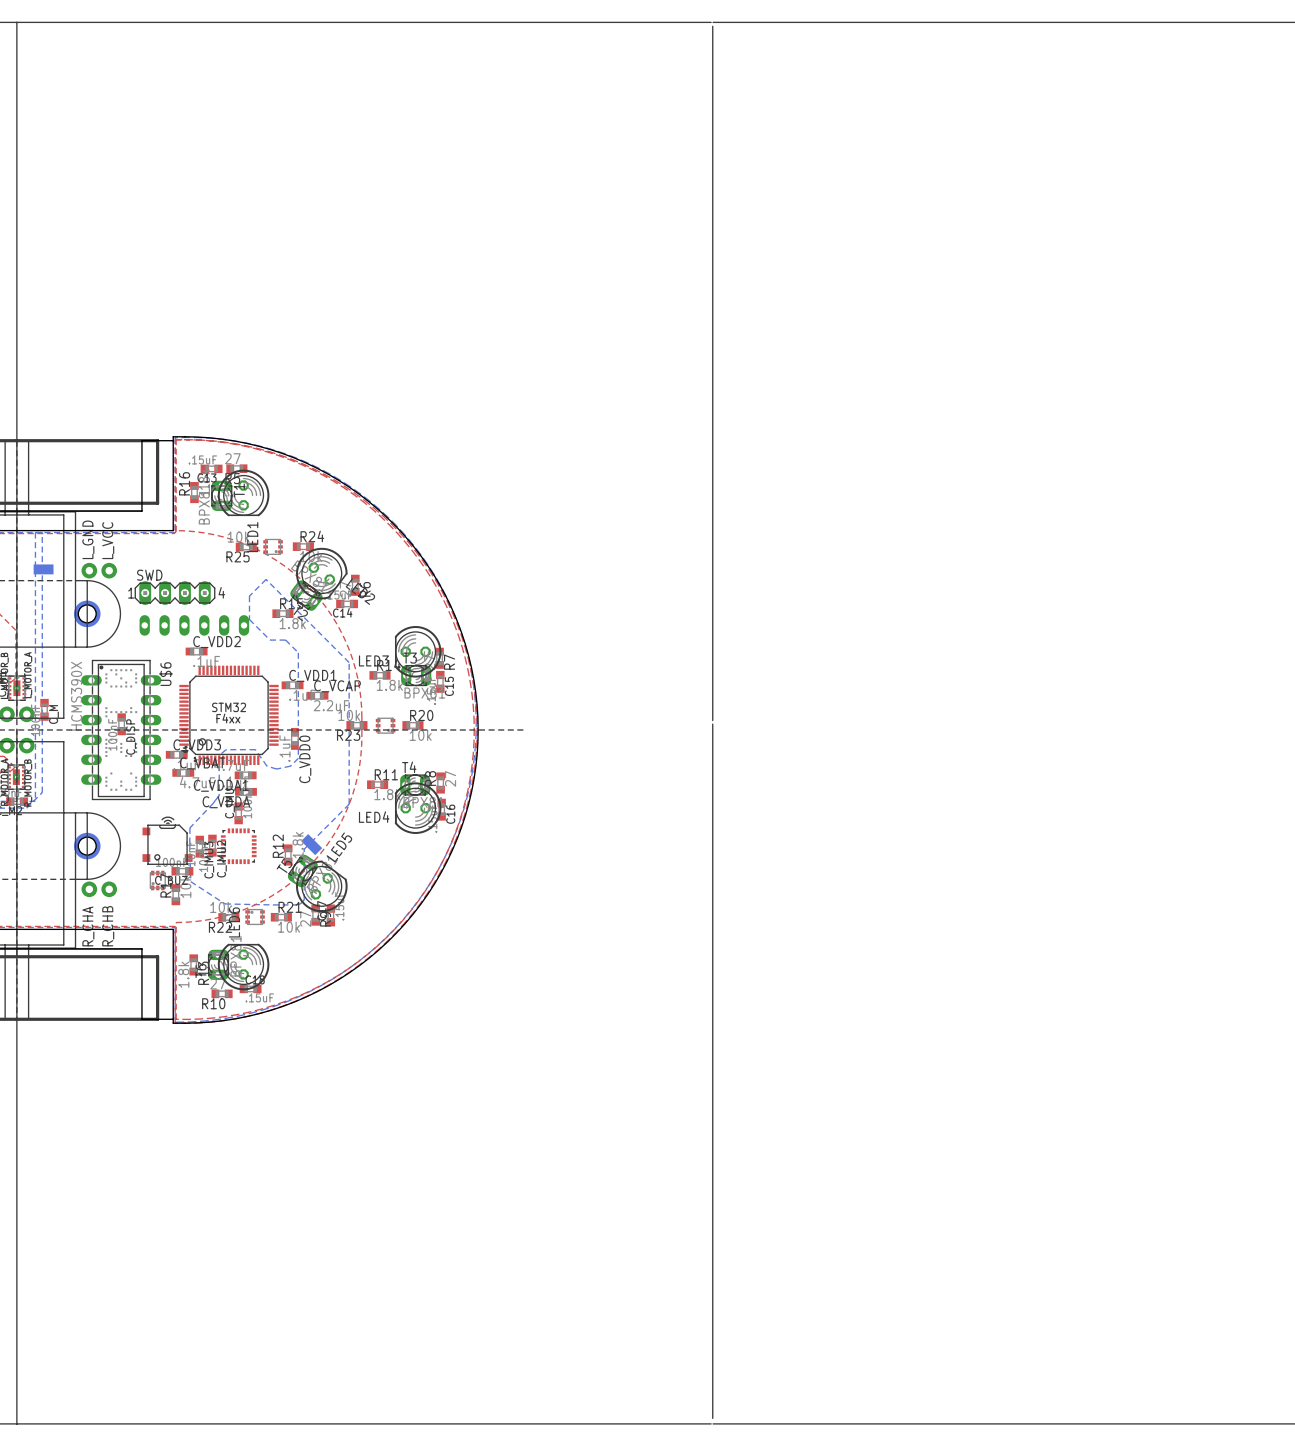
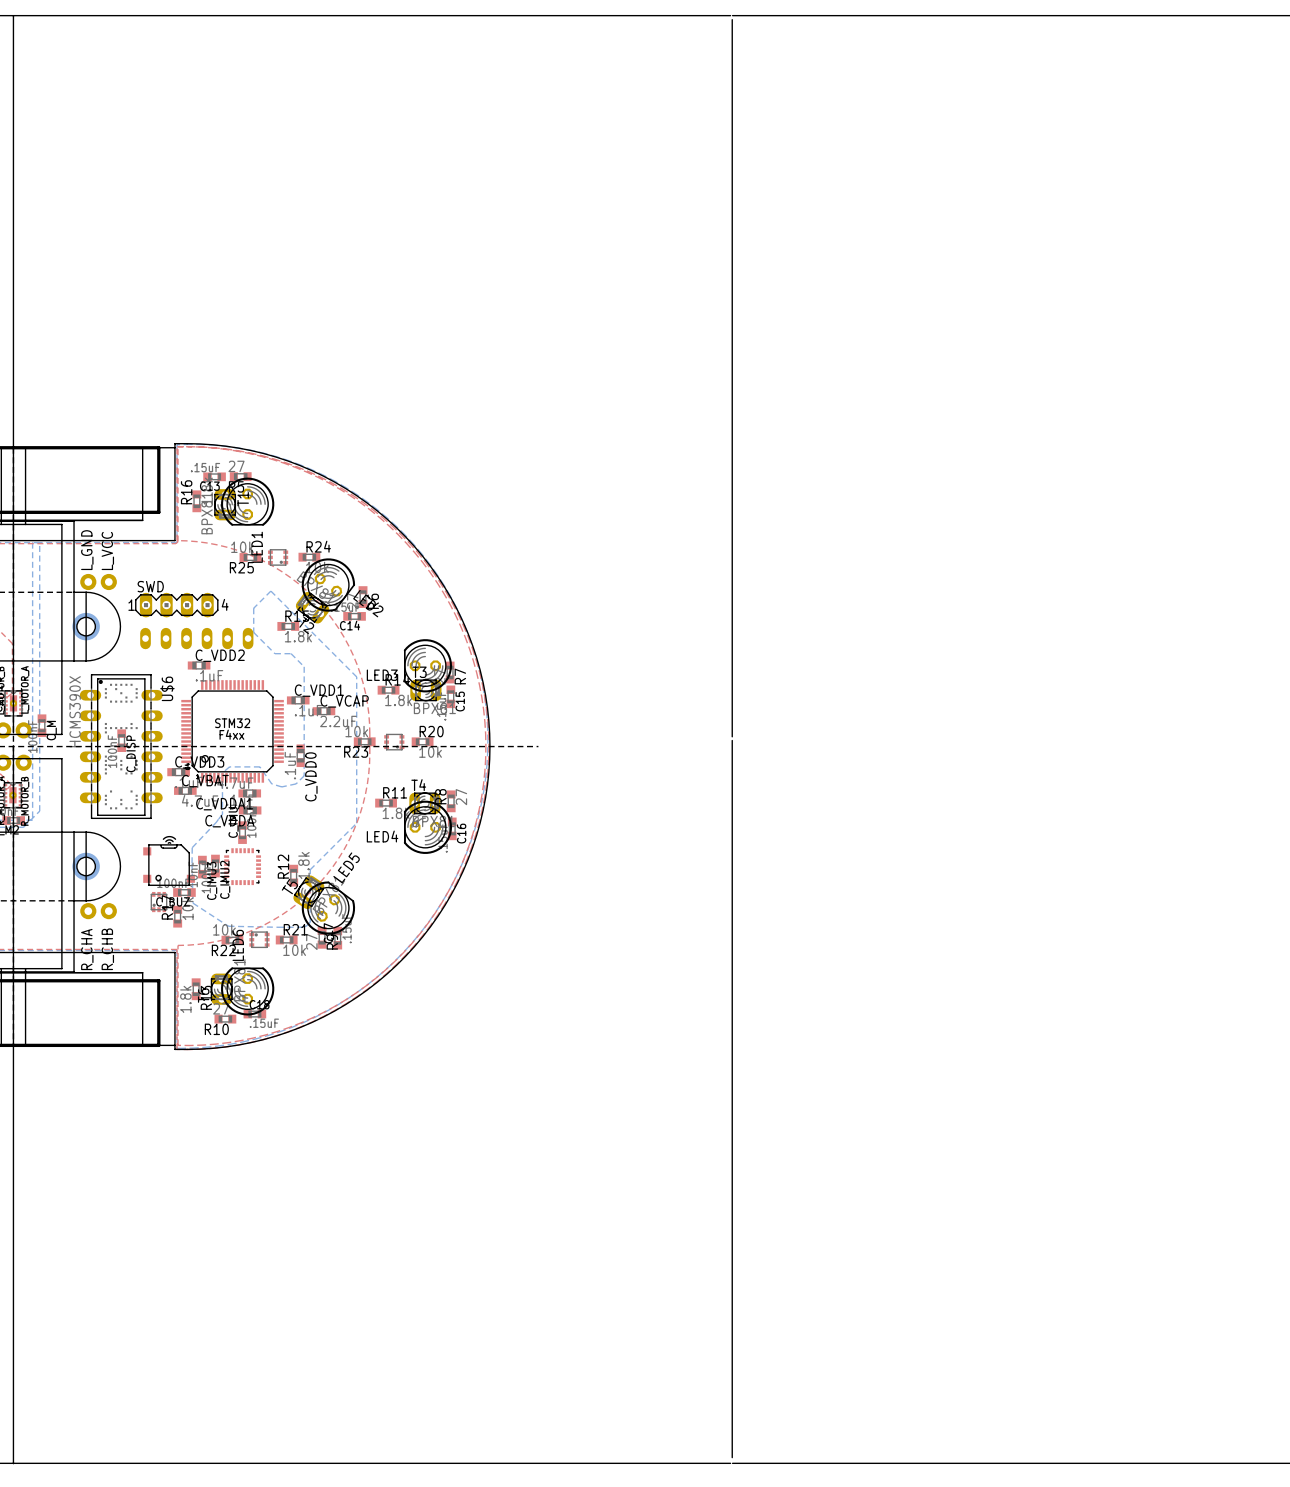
part: (43, 569) -> none
part: (311, 844) -> none

